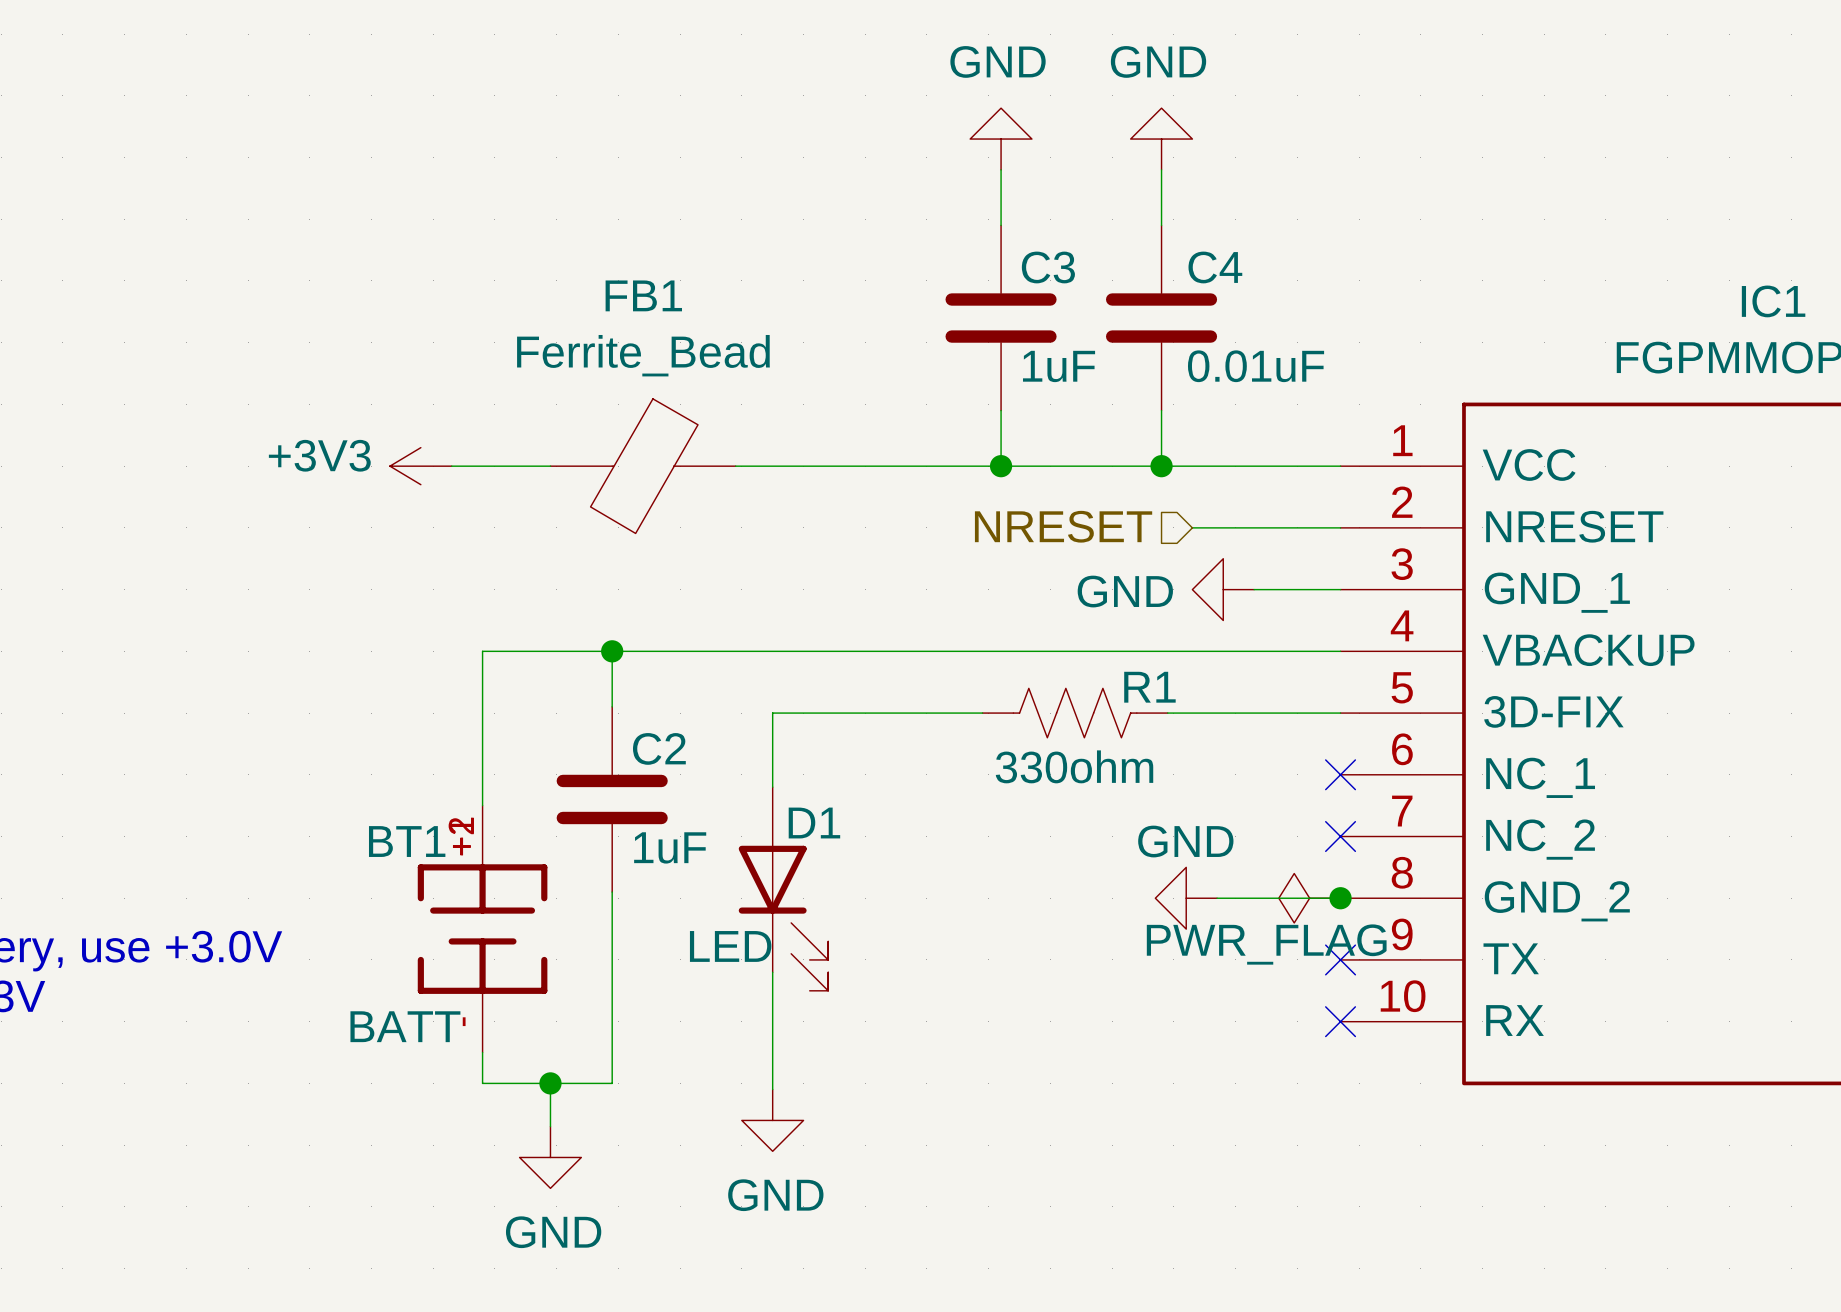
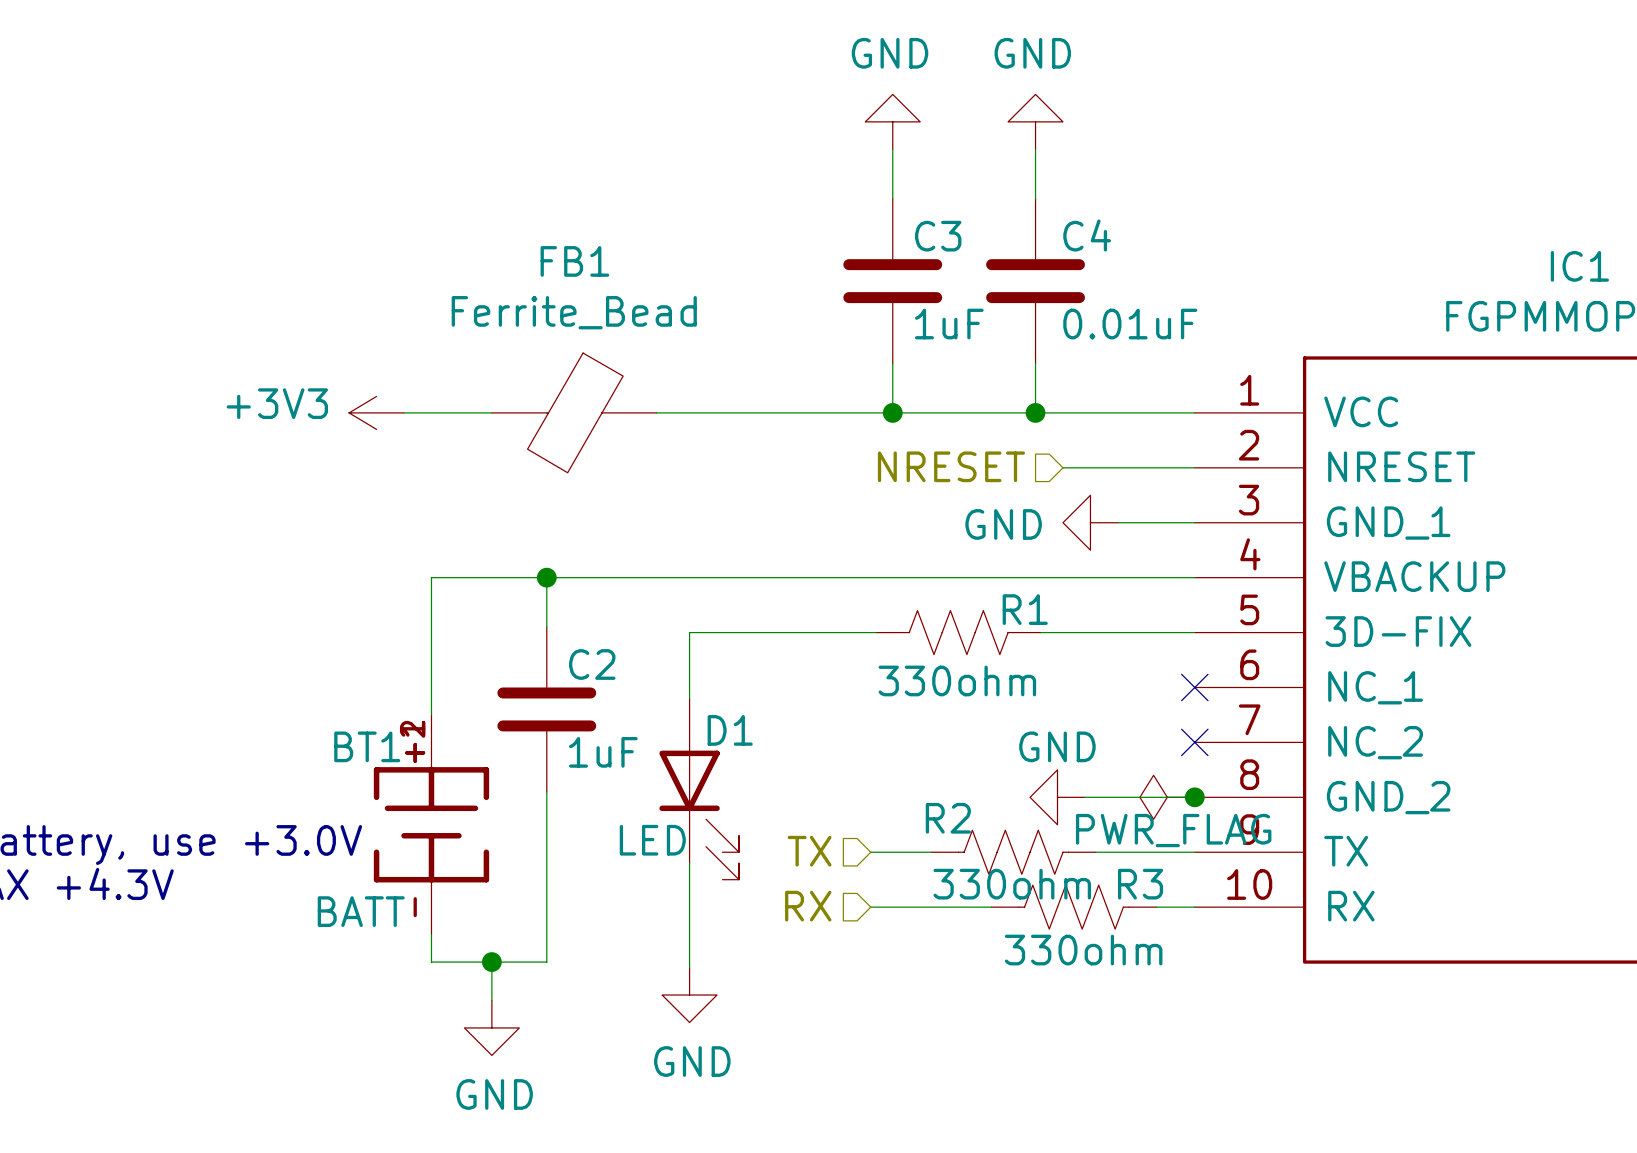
power symbol text position: PWR_FLAG (1266, 944) -> PWR_FLAG (1173, 830)
hierarchical label: none -> TX (809, 851)
wire: none -> (870, 852) (931, 852)
R2: none -> 330ohm (1013, 852)
wire: none -> (1095, 852) (1194, 852)
no-connect mark: (1340, 959) -> none
hierarchical label: none -> RX (808, 906)
wire: none -> (870, 907) (991, 907)
R3: none -> 330ohm (1073, 907)
wire: none -> (1156, 907) (1194, 907)
no-connect mark: (1340, 1021) -> none

